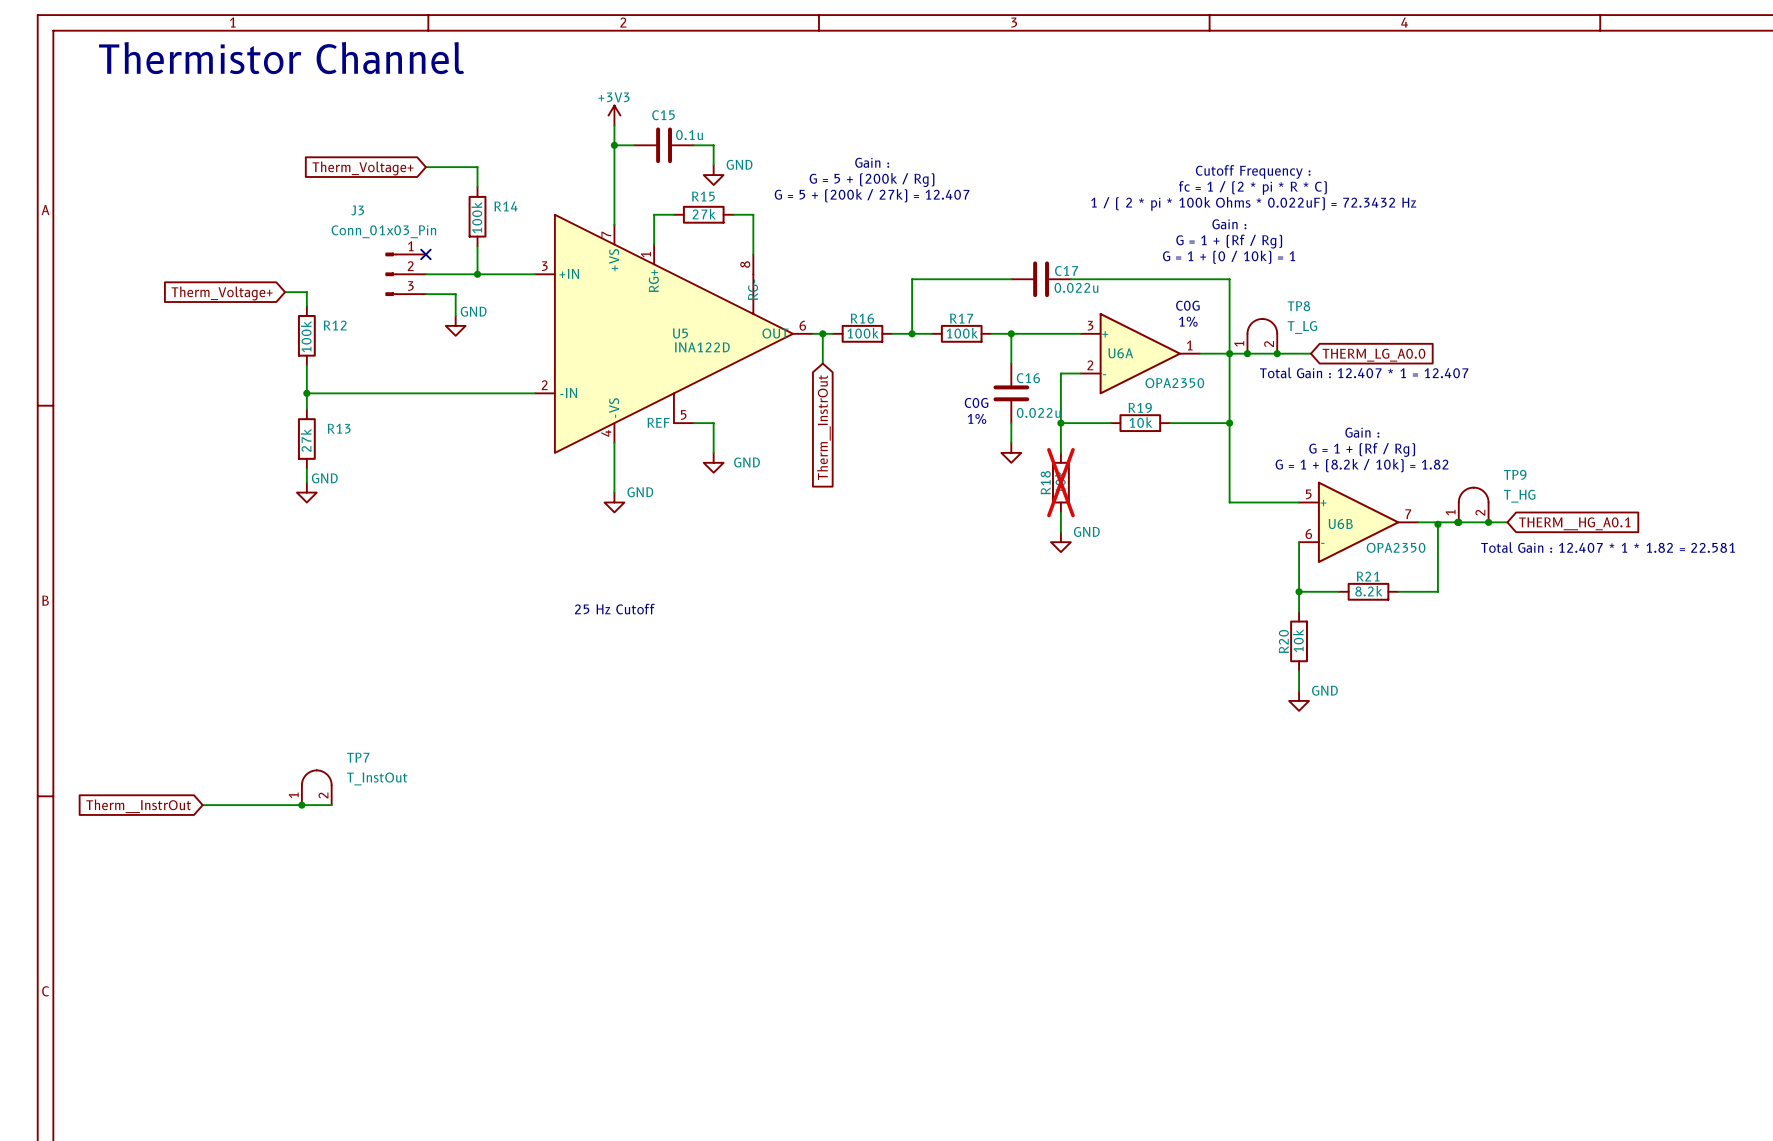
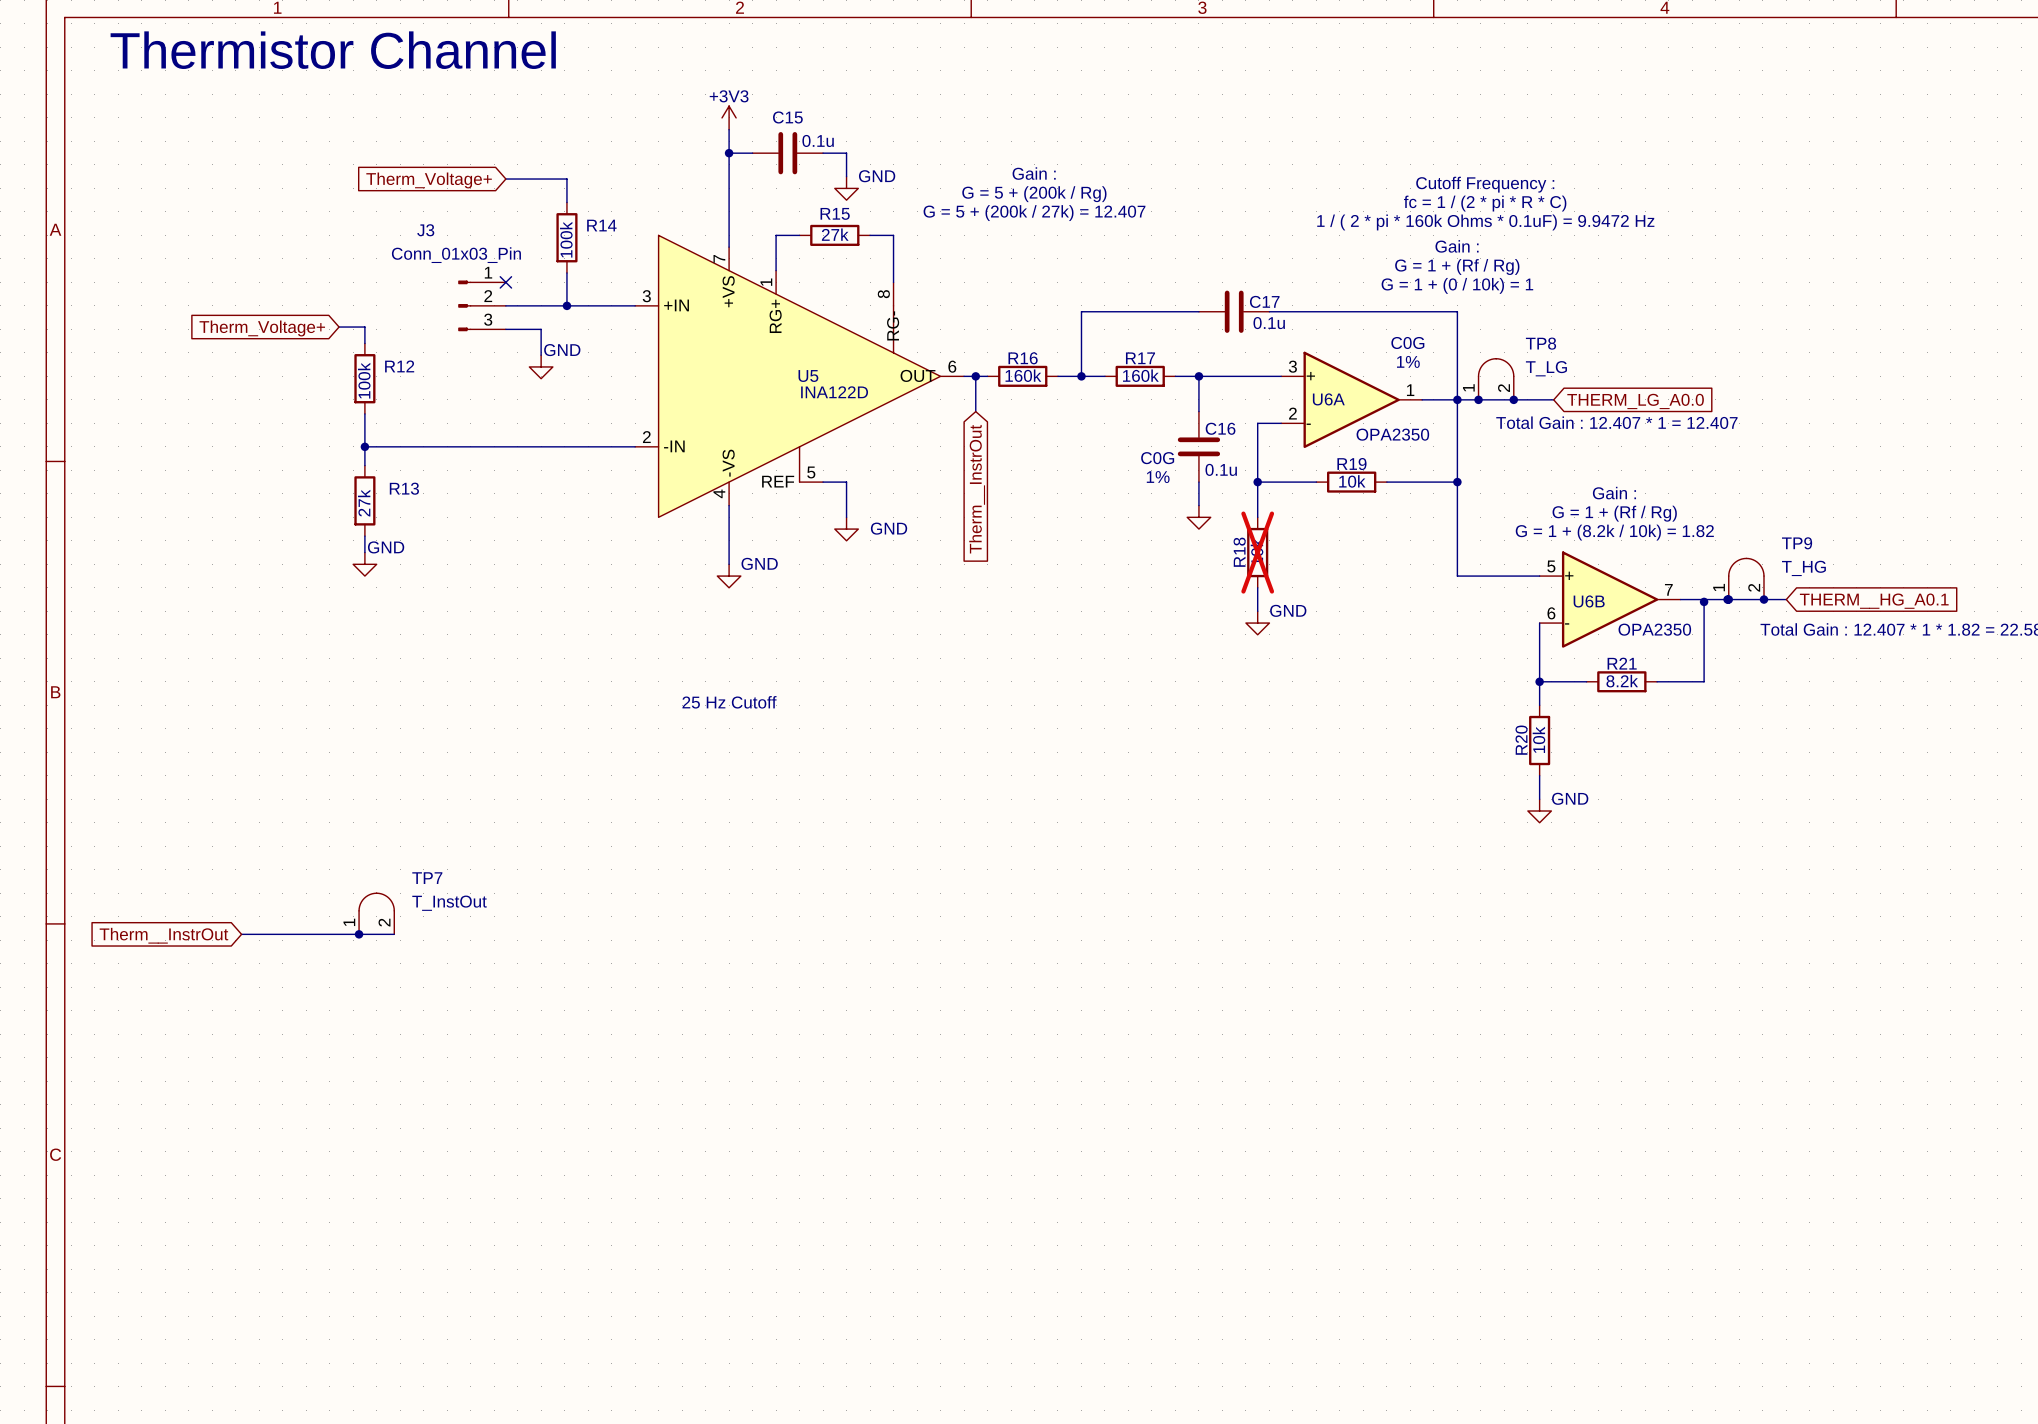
text: 1 / ( 2 * pi * 100k Ohms * 0.022uF) = 72.3432 Hz (1253, 203) -> 1 / ( 2 * pi * 160k Ohms * 0.1uF) = 9.9472 Hz (1485, 222)
C17 value: 0.022u (1076, 287) -> 0.1u (1269, 323)
R16 value: 100k (863, 333) -> 160k (1023, 375)
R17 value: 100k (962, 333) -> 160k (1140, 375)
C16 value: 0.022u (1038, 412) -> 0.1u (1221, 469)

